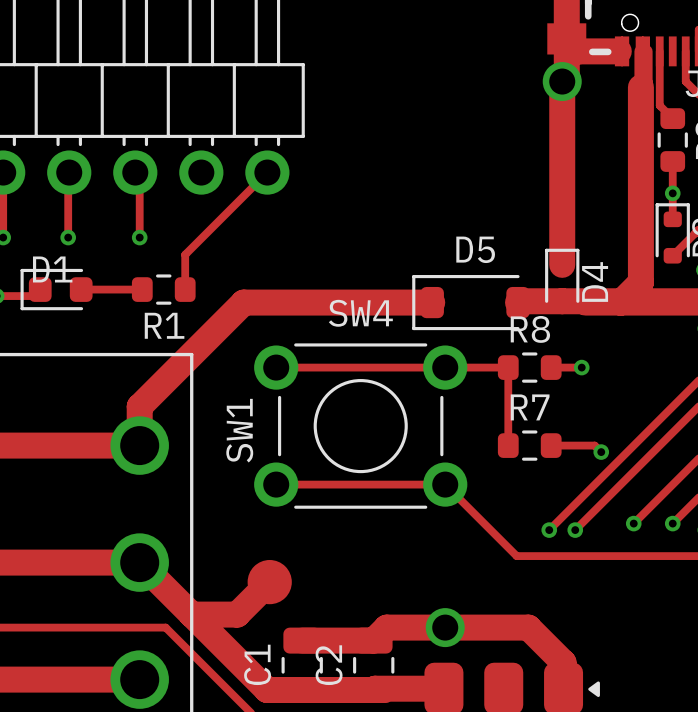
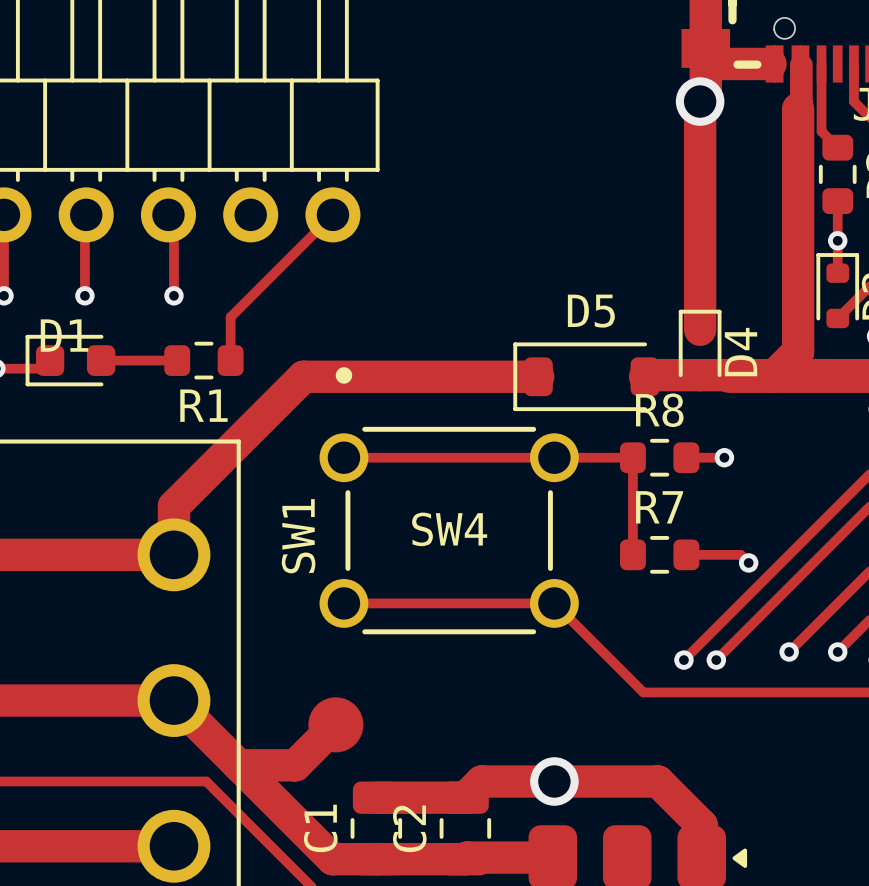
SW4 name position: SW4 (360, 313) -> SW4 (449, 529)
SW4 footprint: [254, 343, 468, 509] -> [319, 367, 579, 635]

